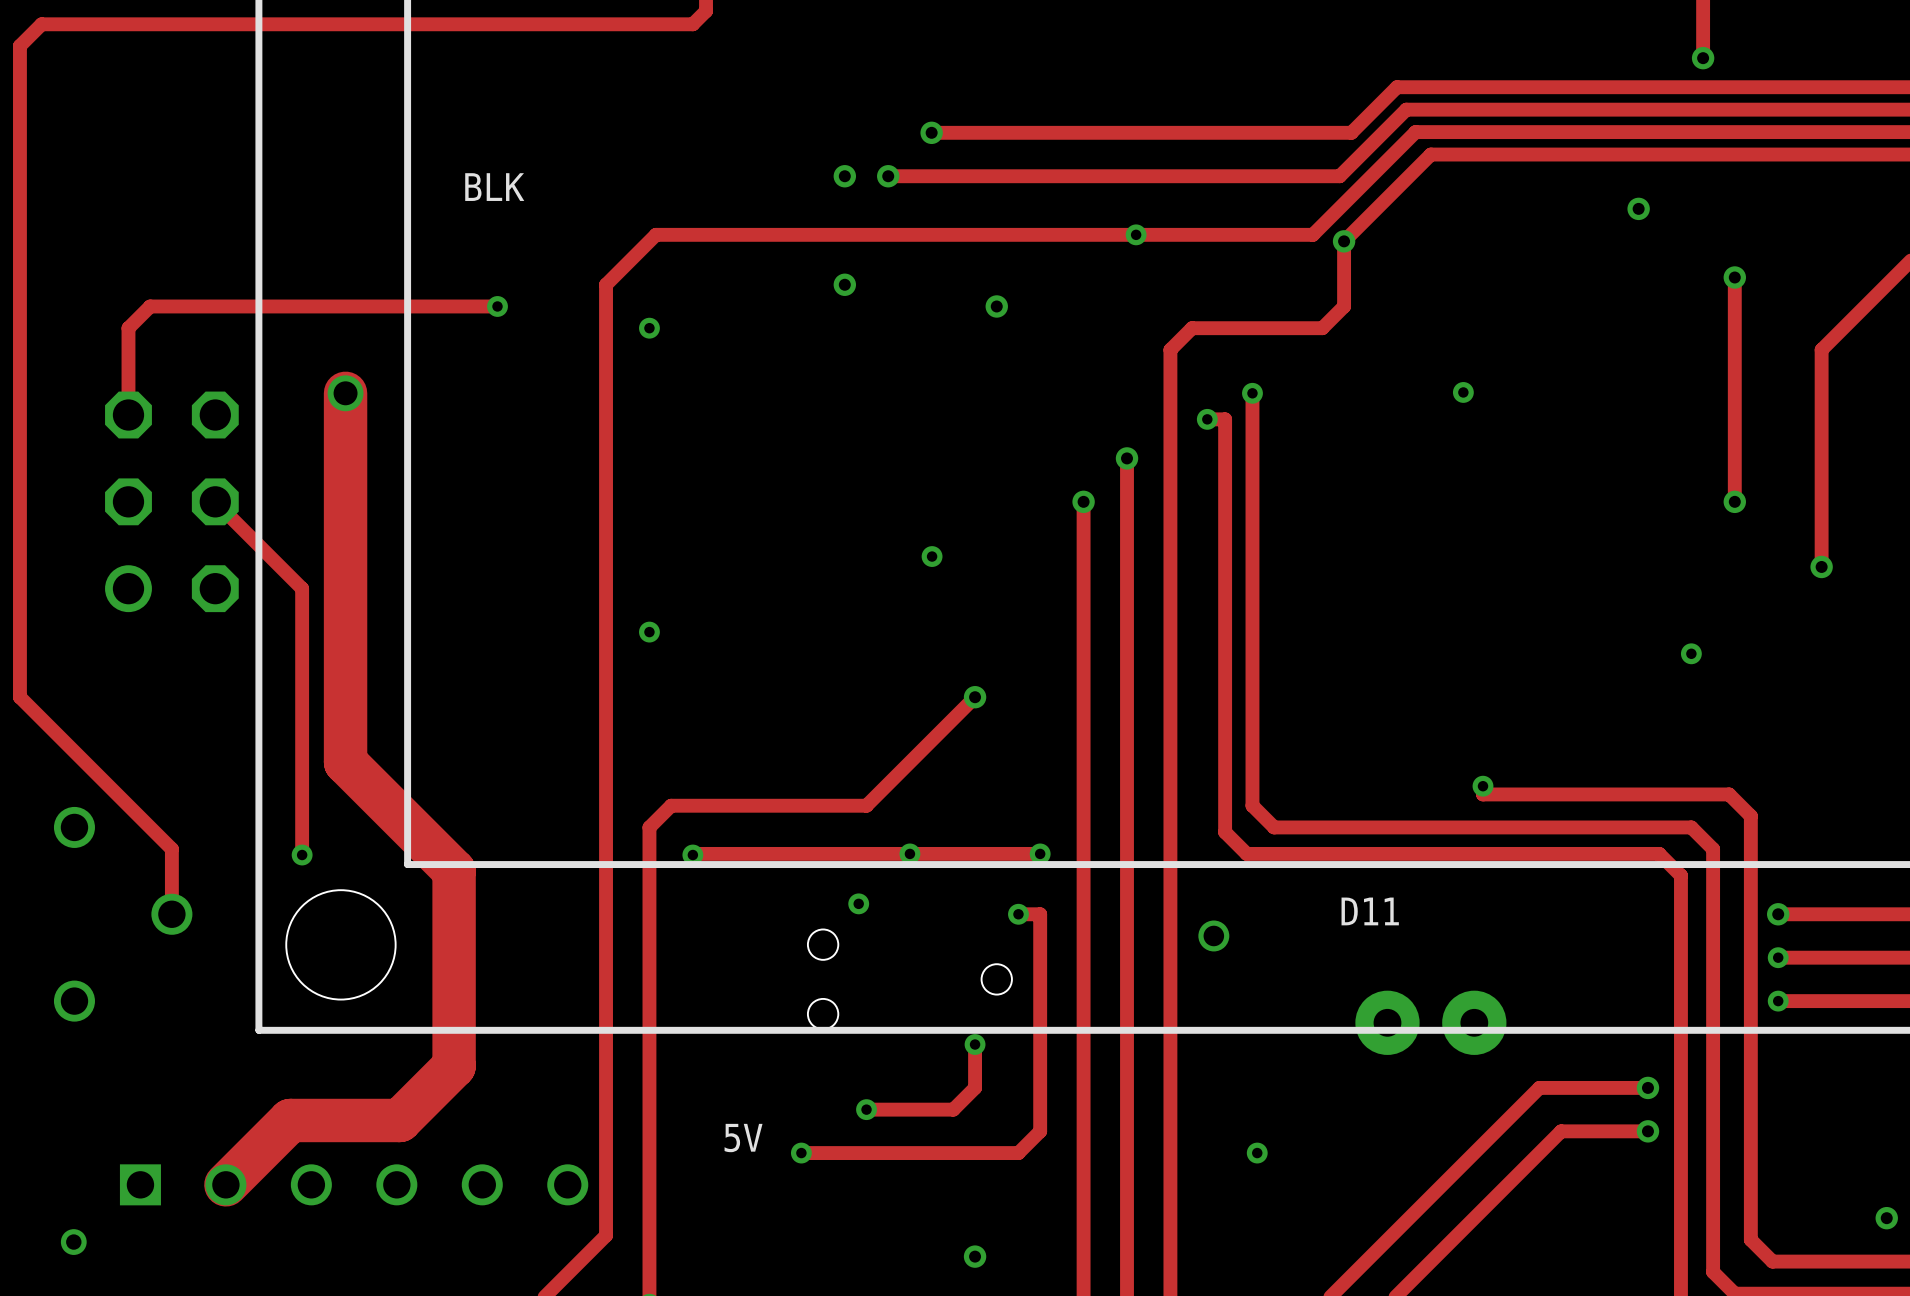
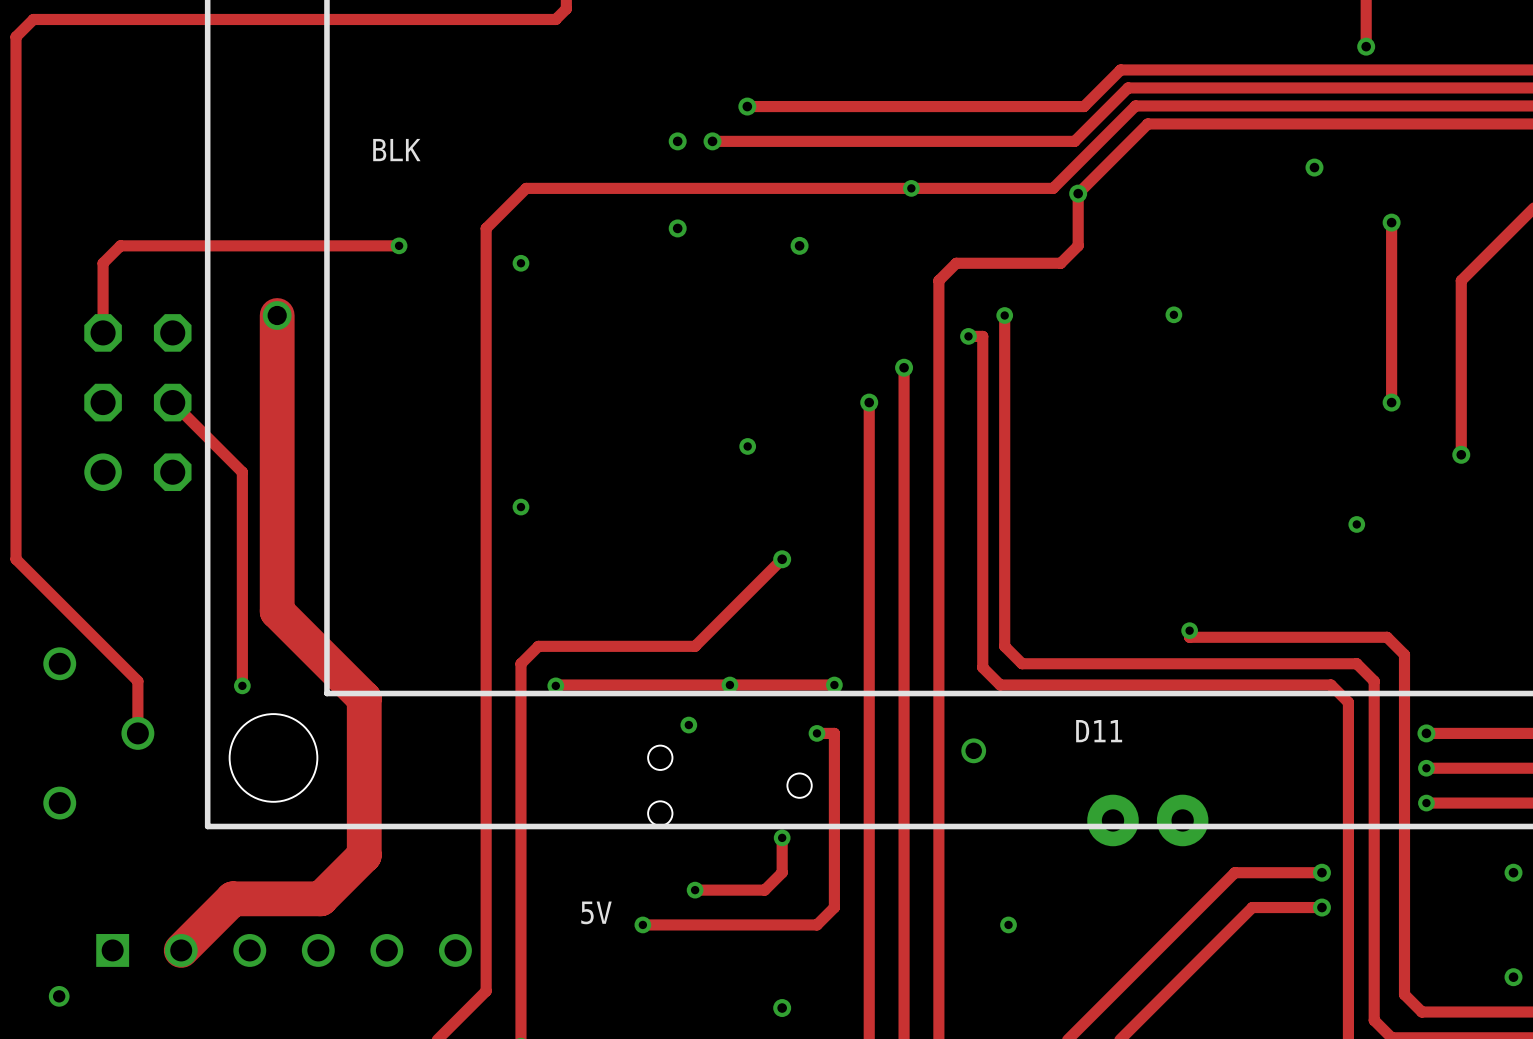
via: none -> (1513, 872)

